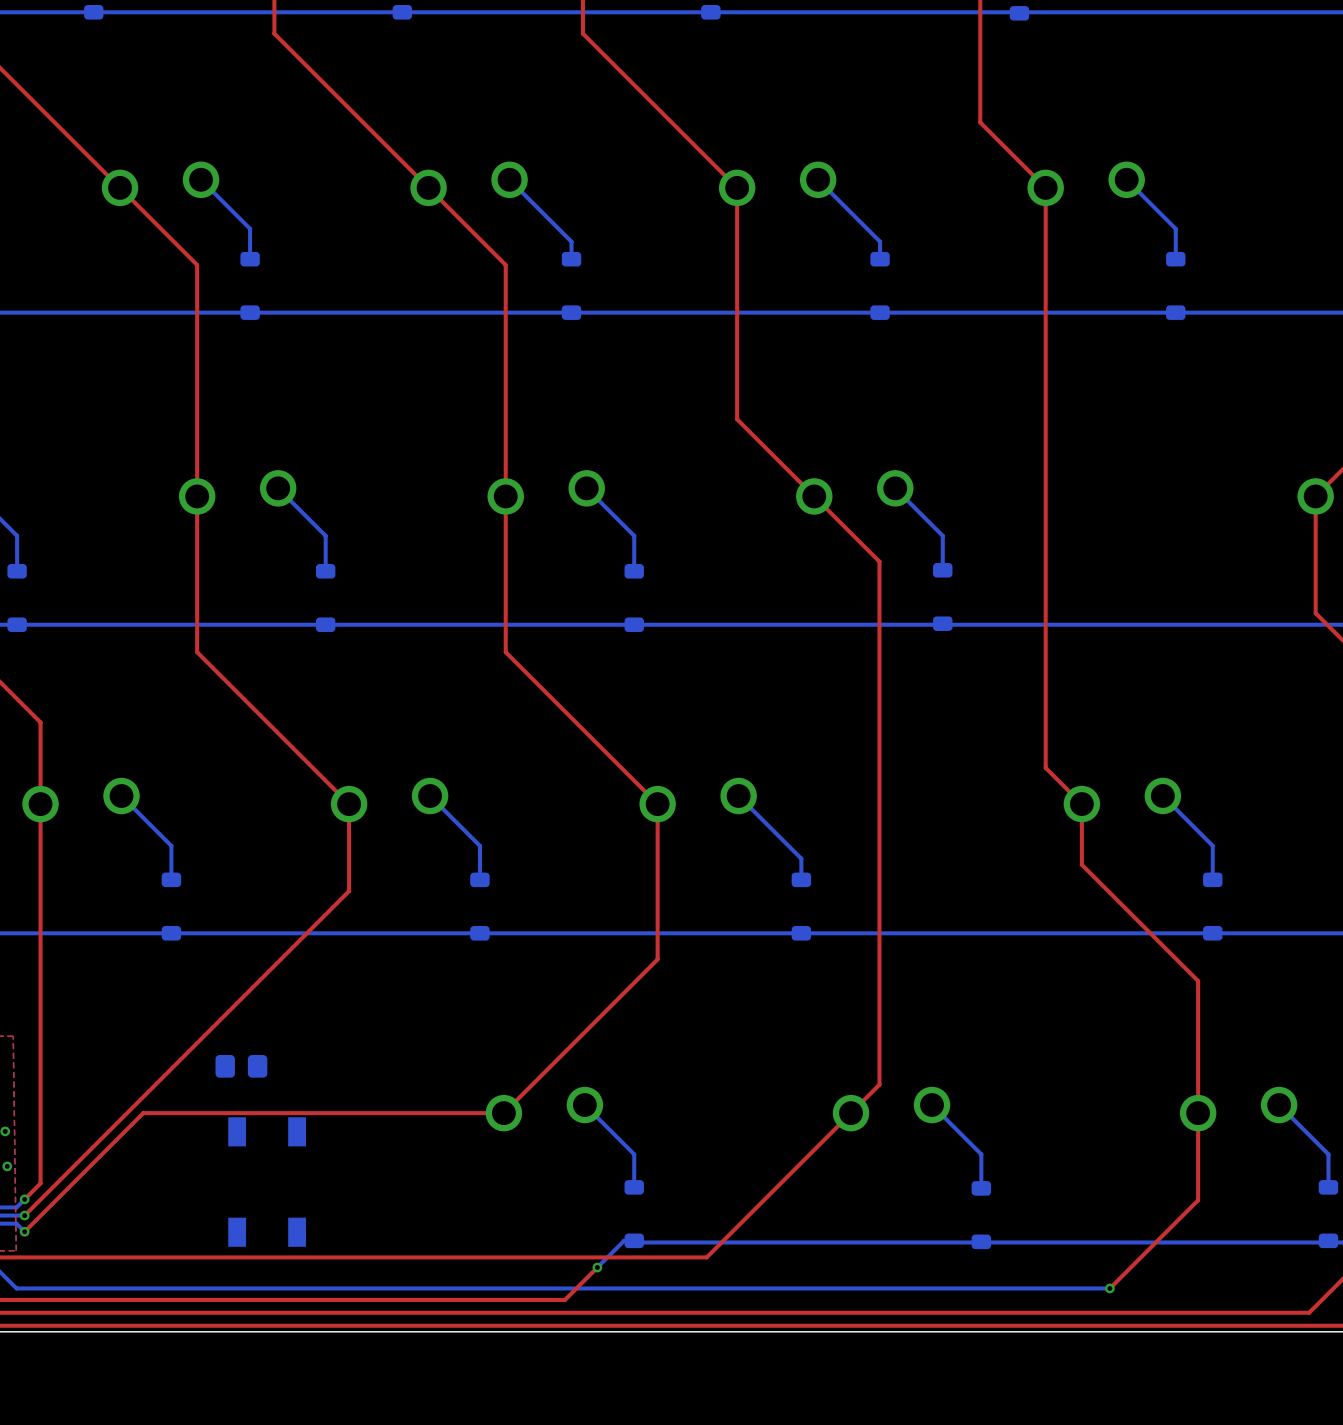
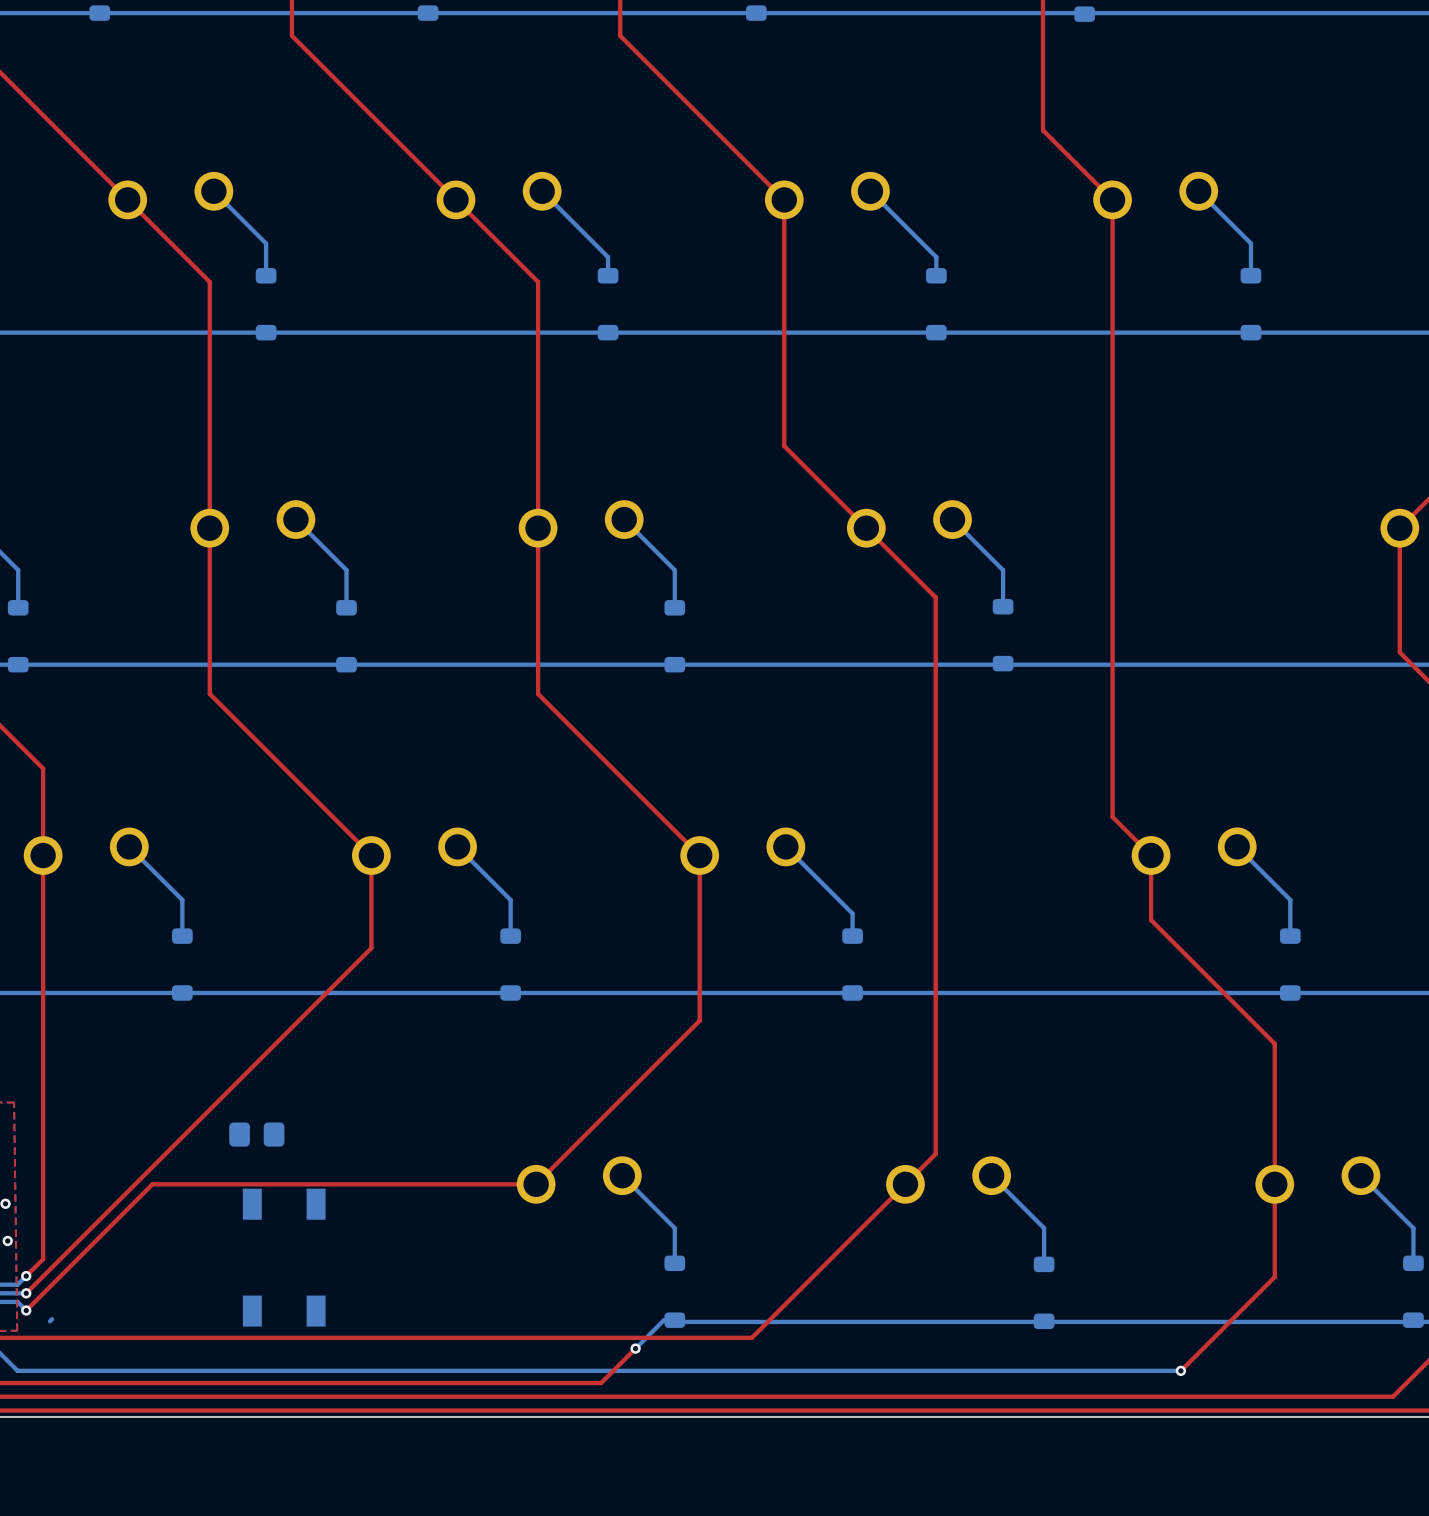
bottom track: none -> (52, 1319) (49, 1321)

